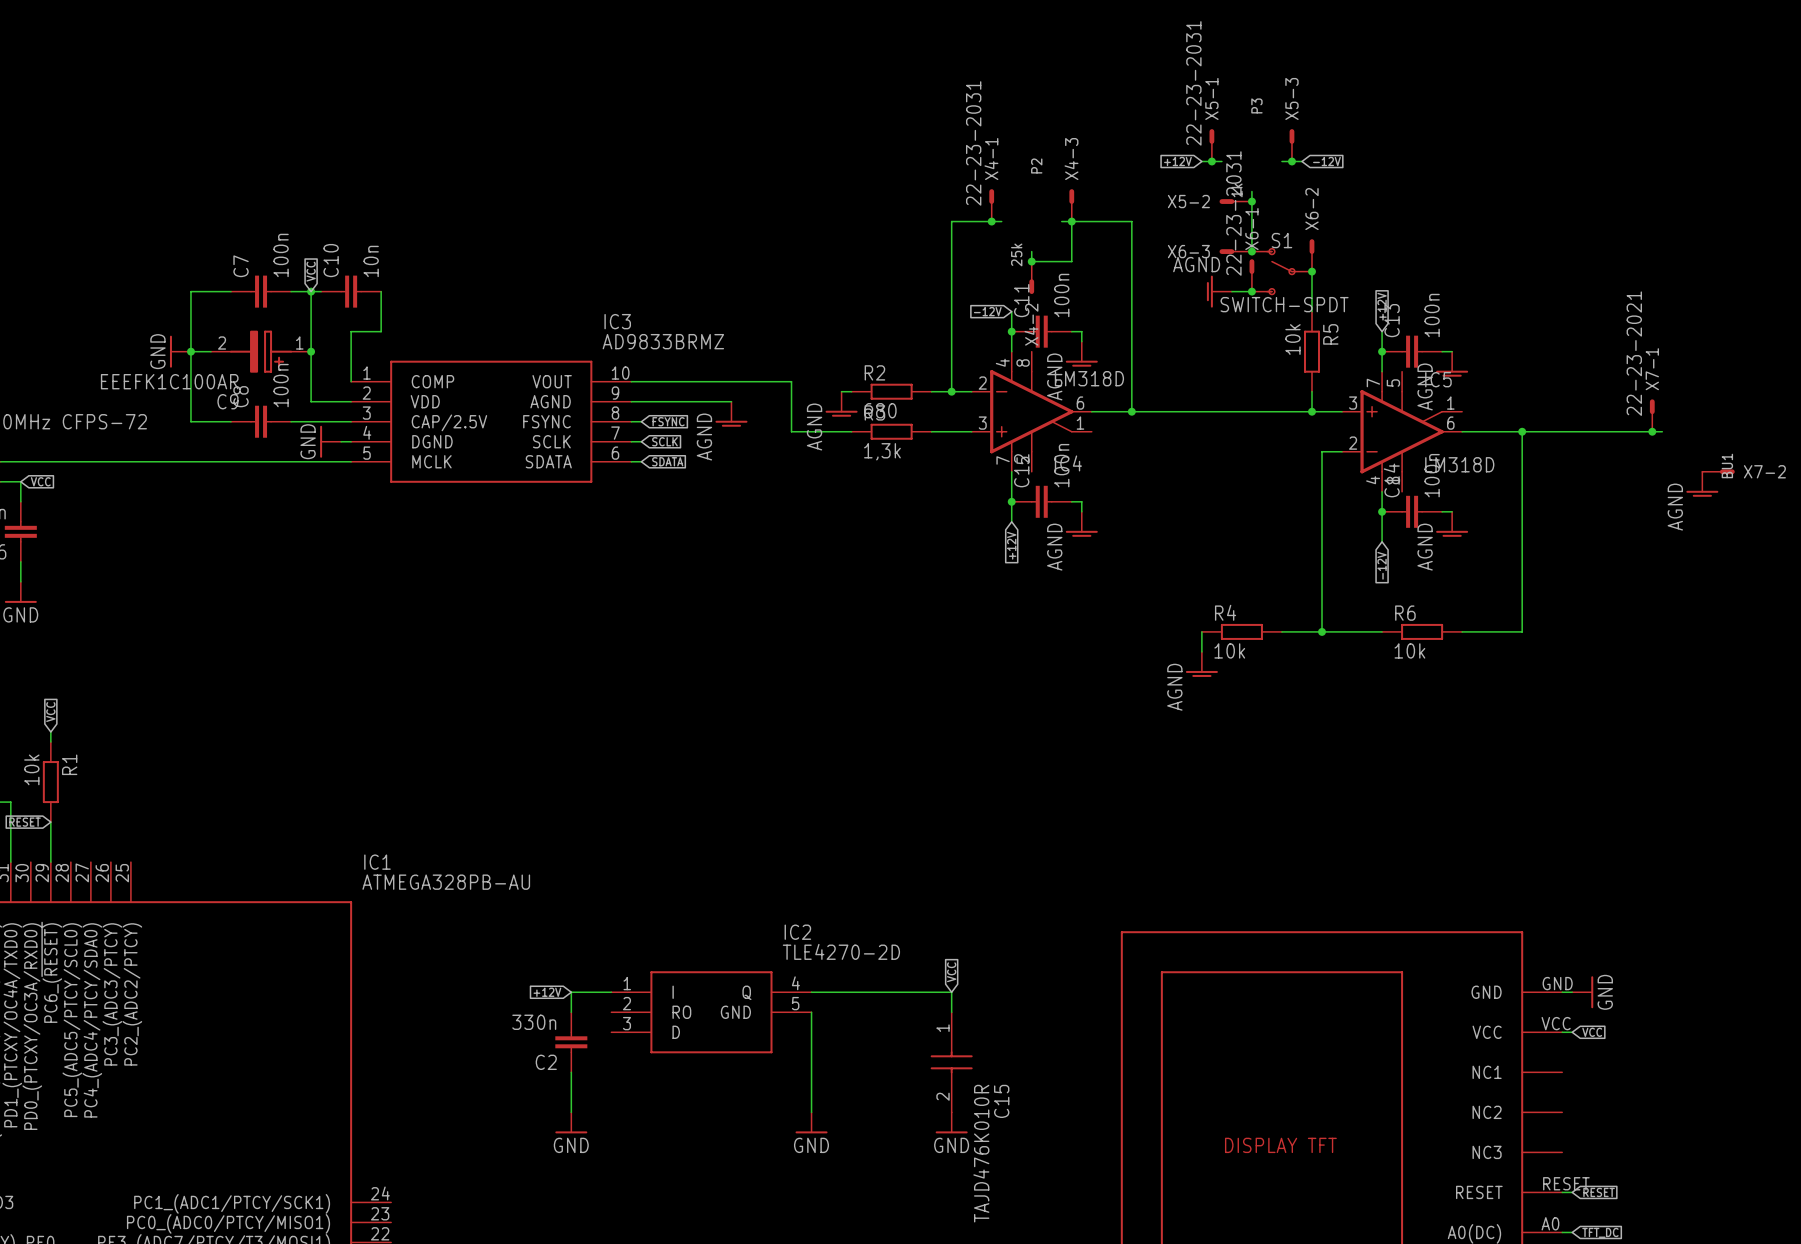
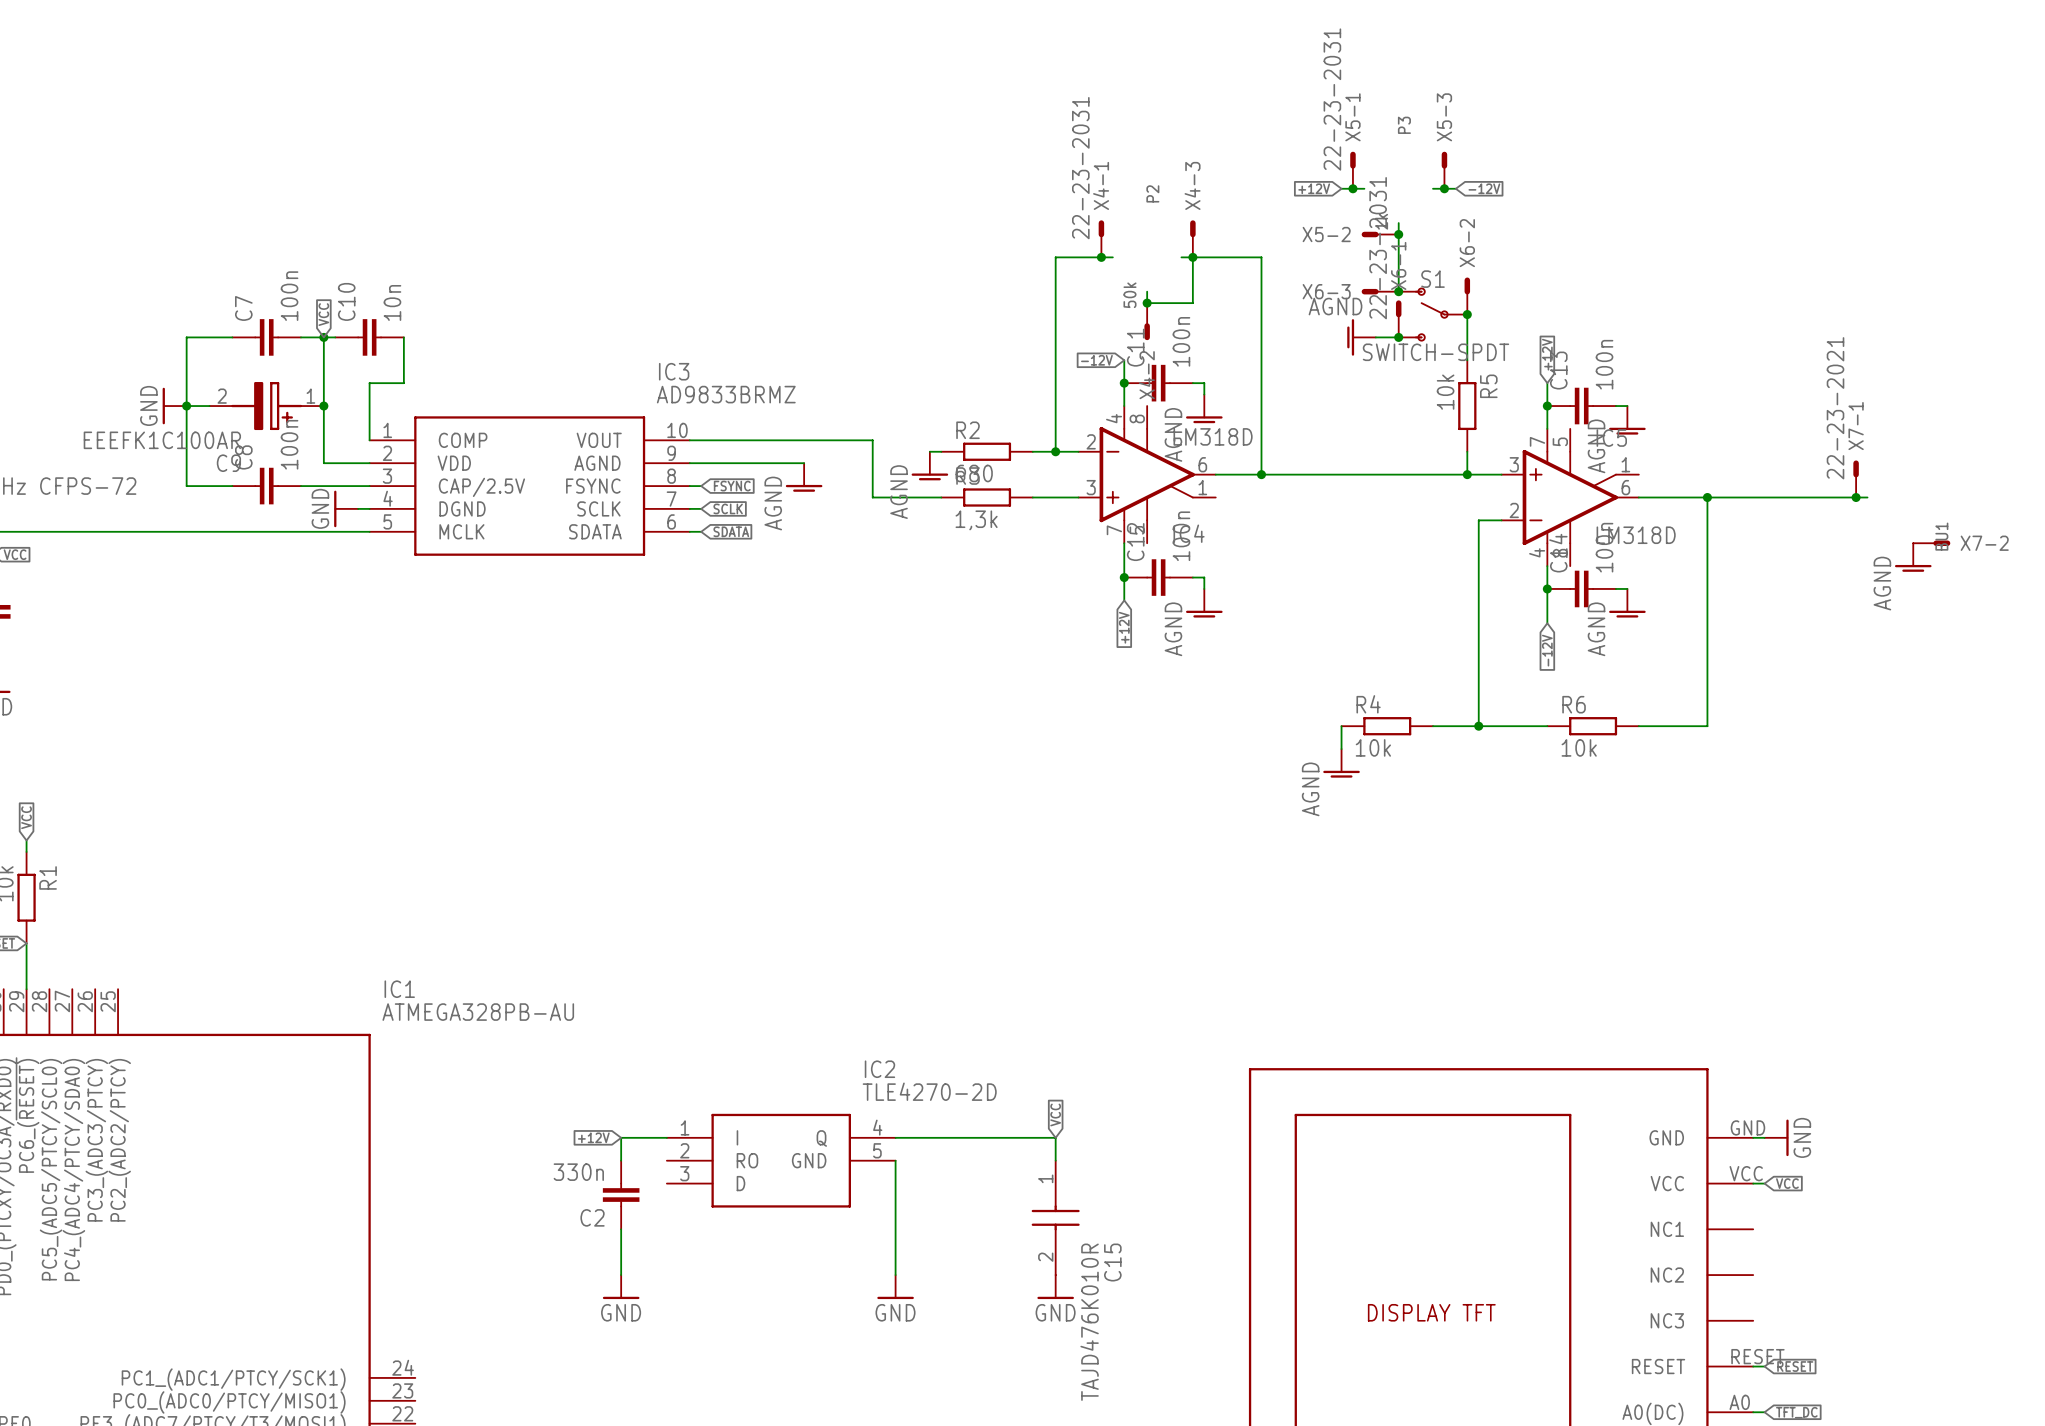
P2 value: 25k (1016, 254) -> 50k (1129, 295)

